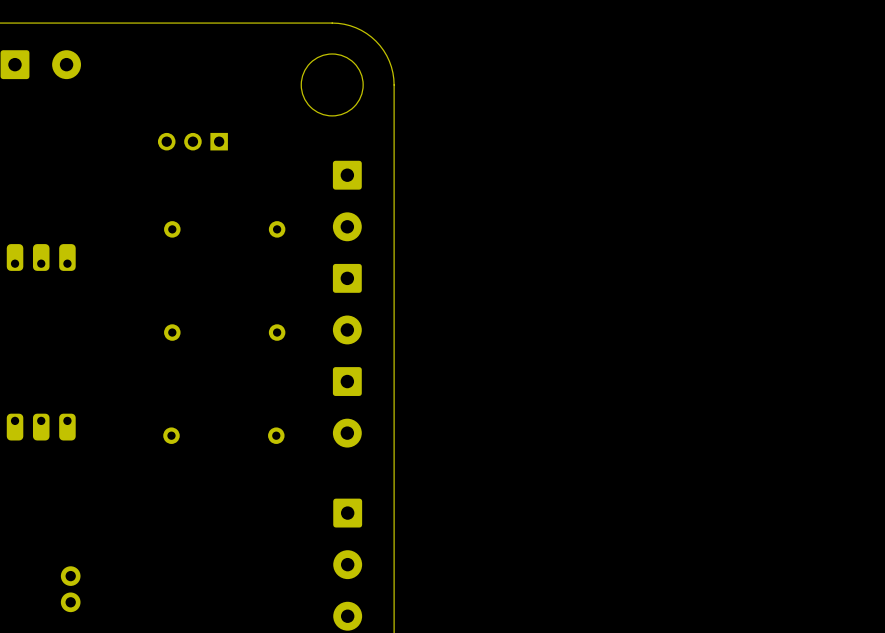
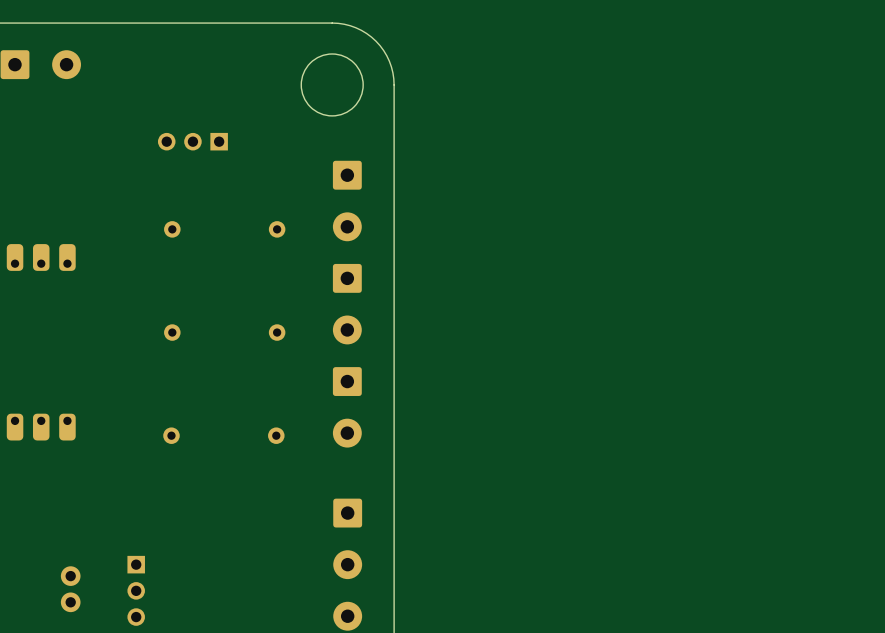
part: none -> (136, 590)

